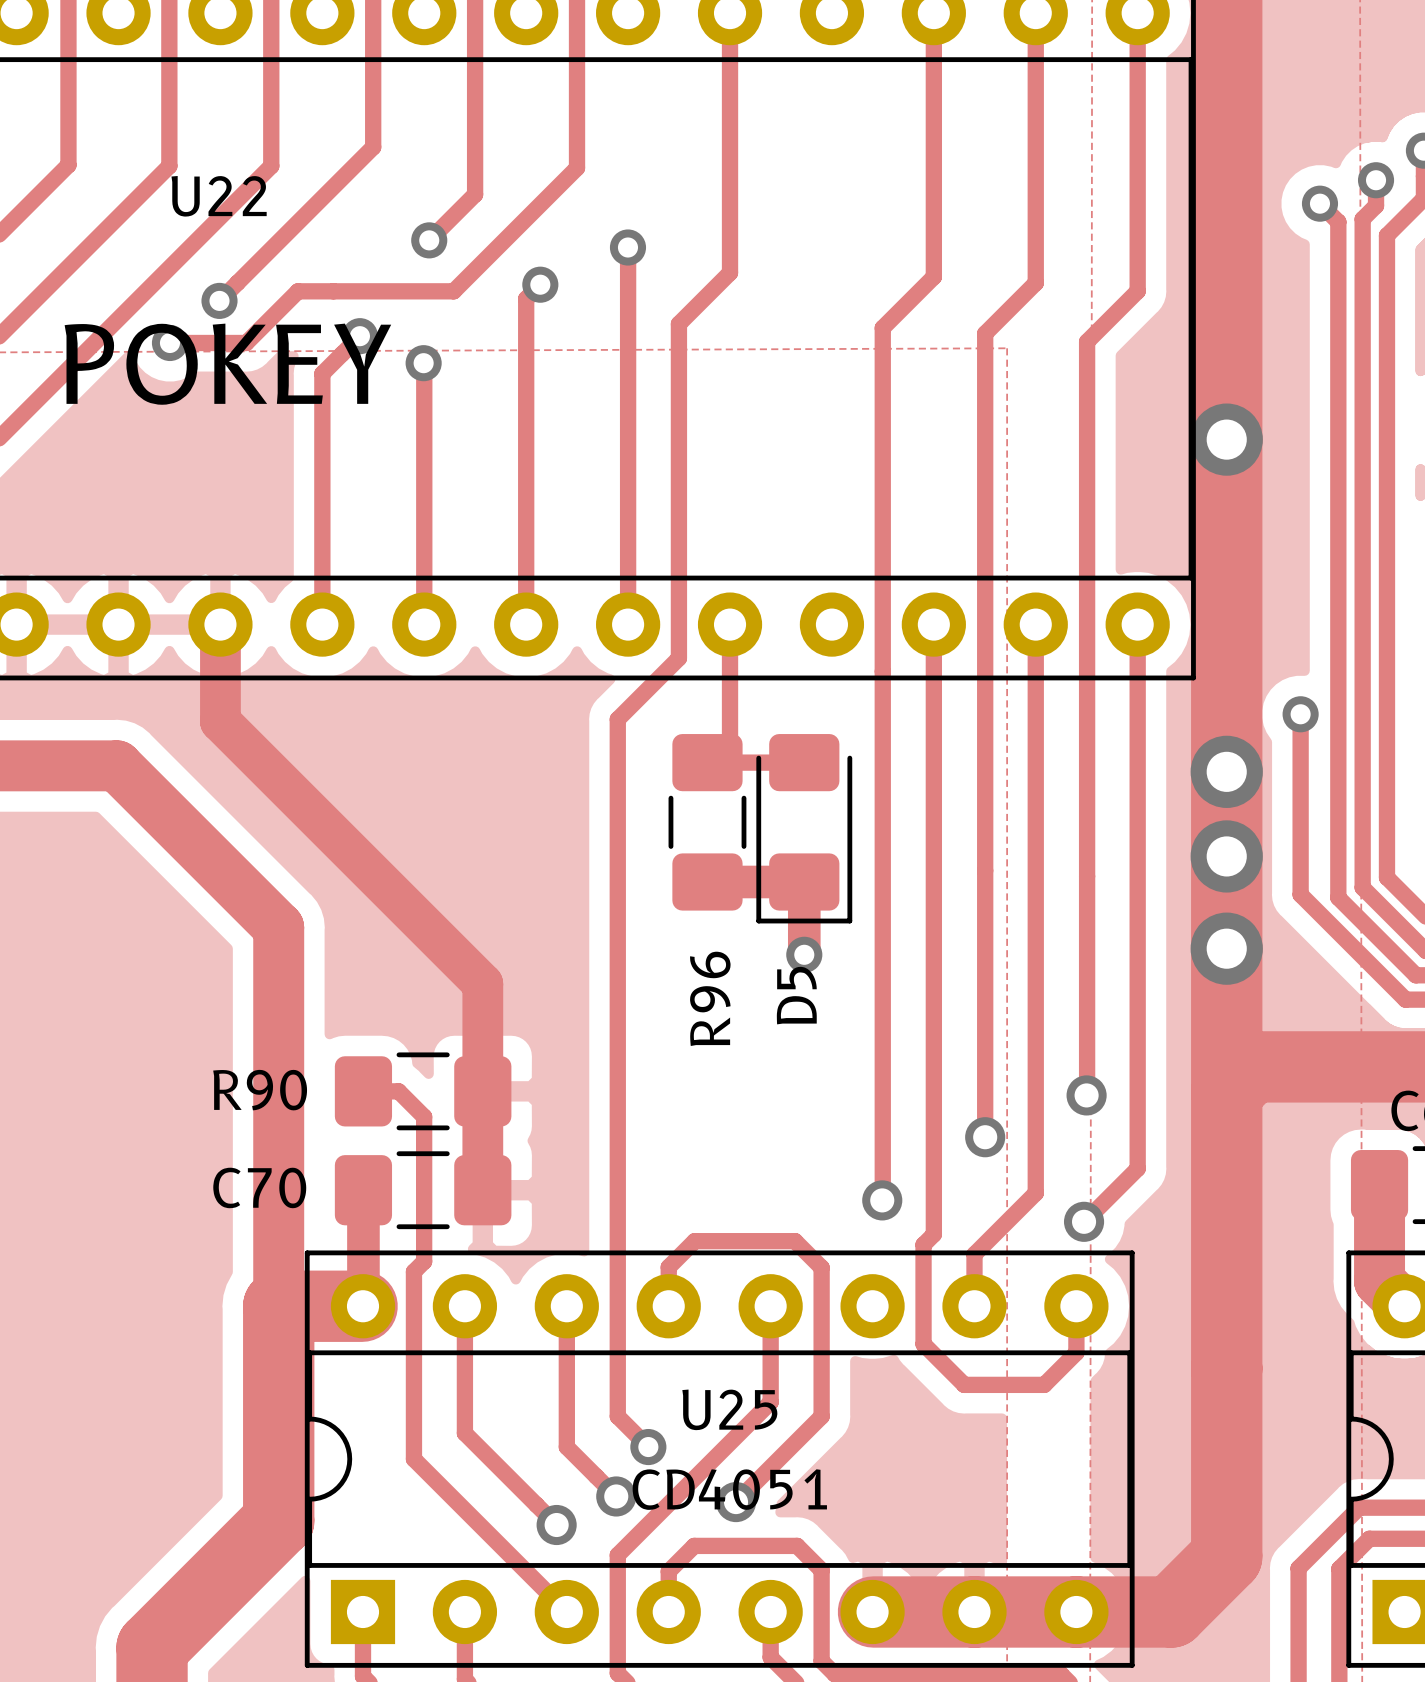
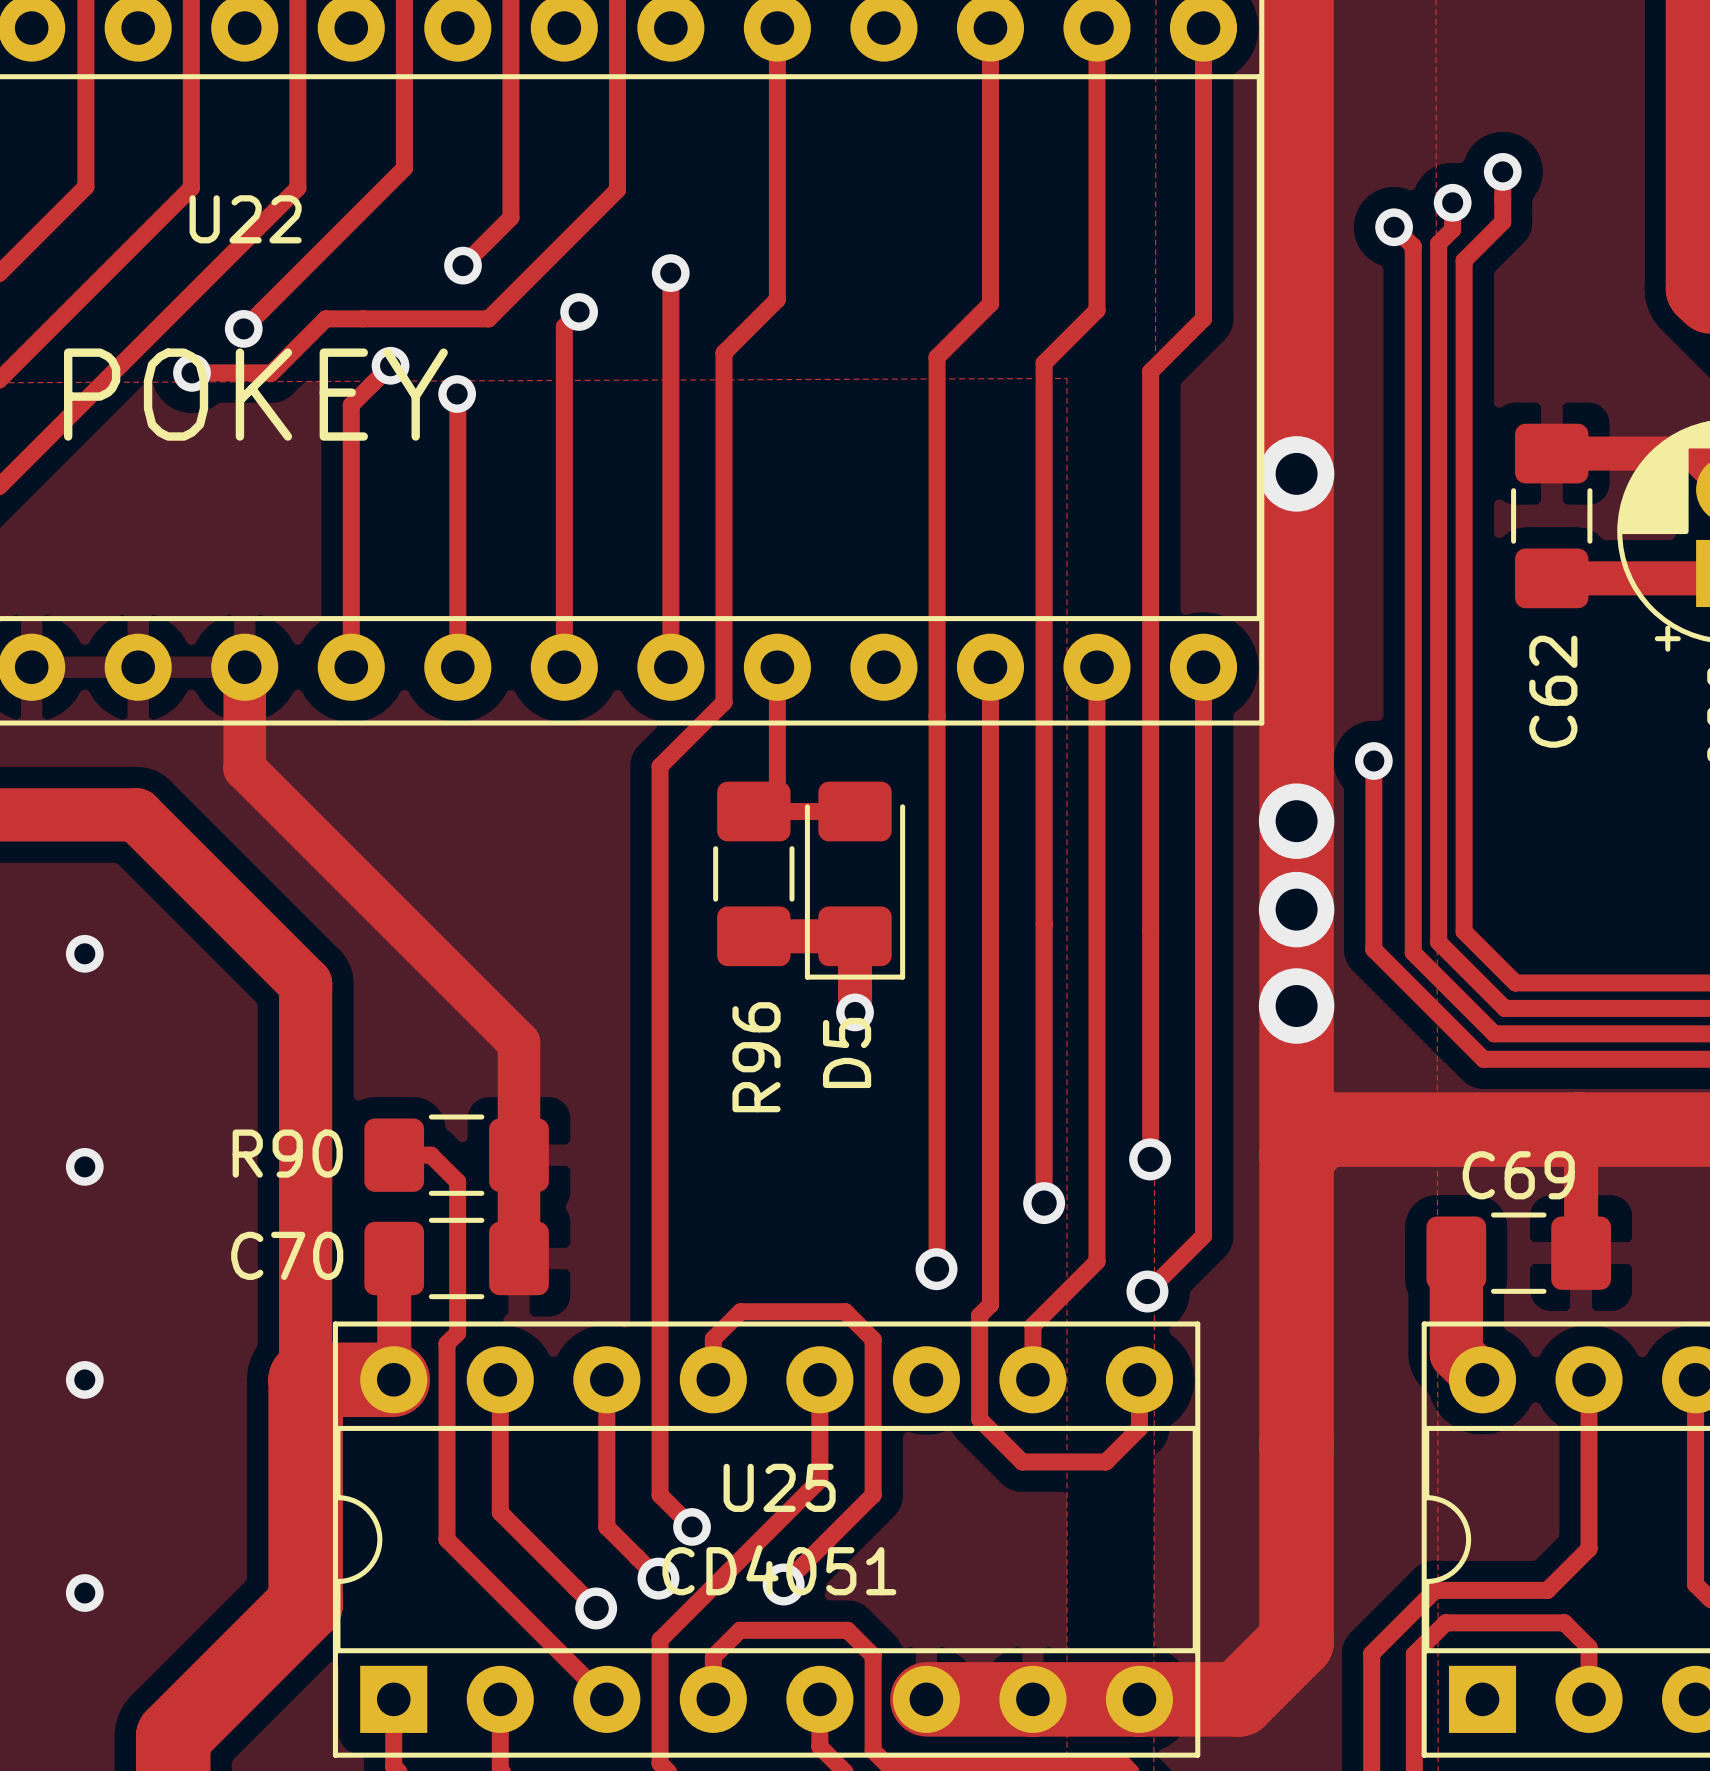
via: none -> (84, 953)
via: none -> (84, 1166)
via: none -> (84, 1379)
via: none -> (84, 1593)

